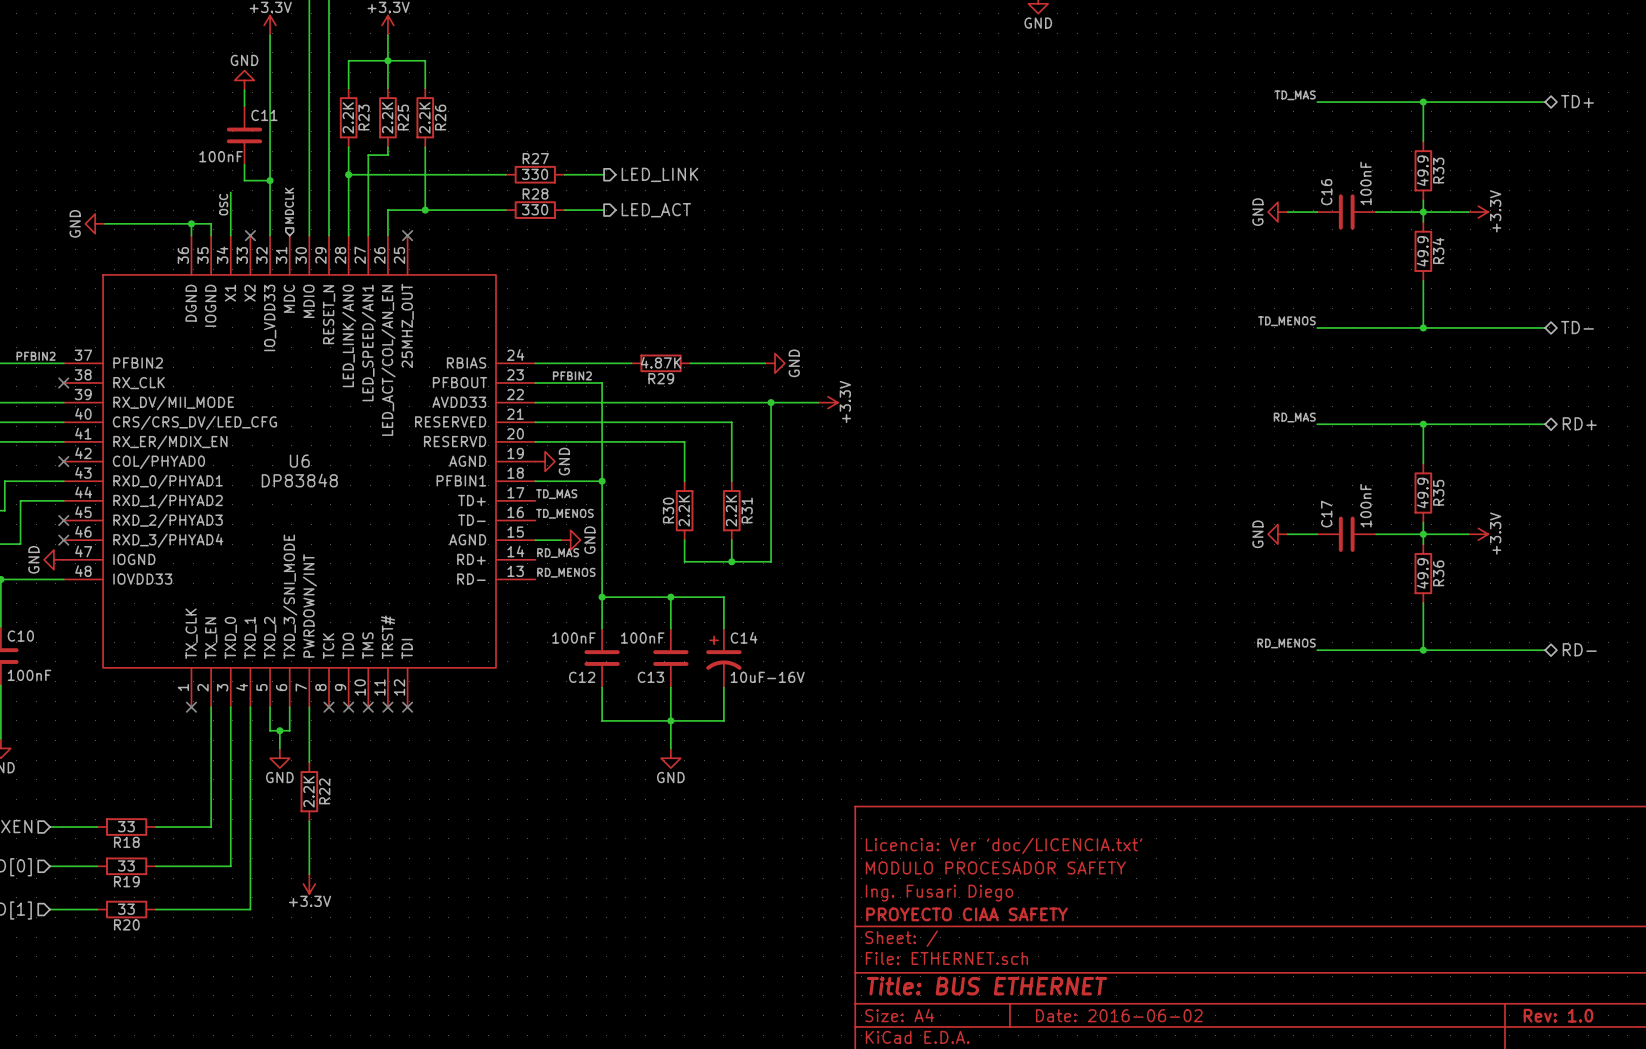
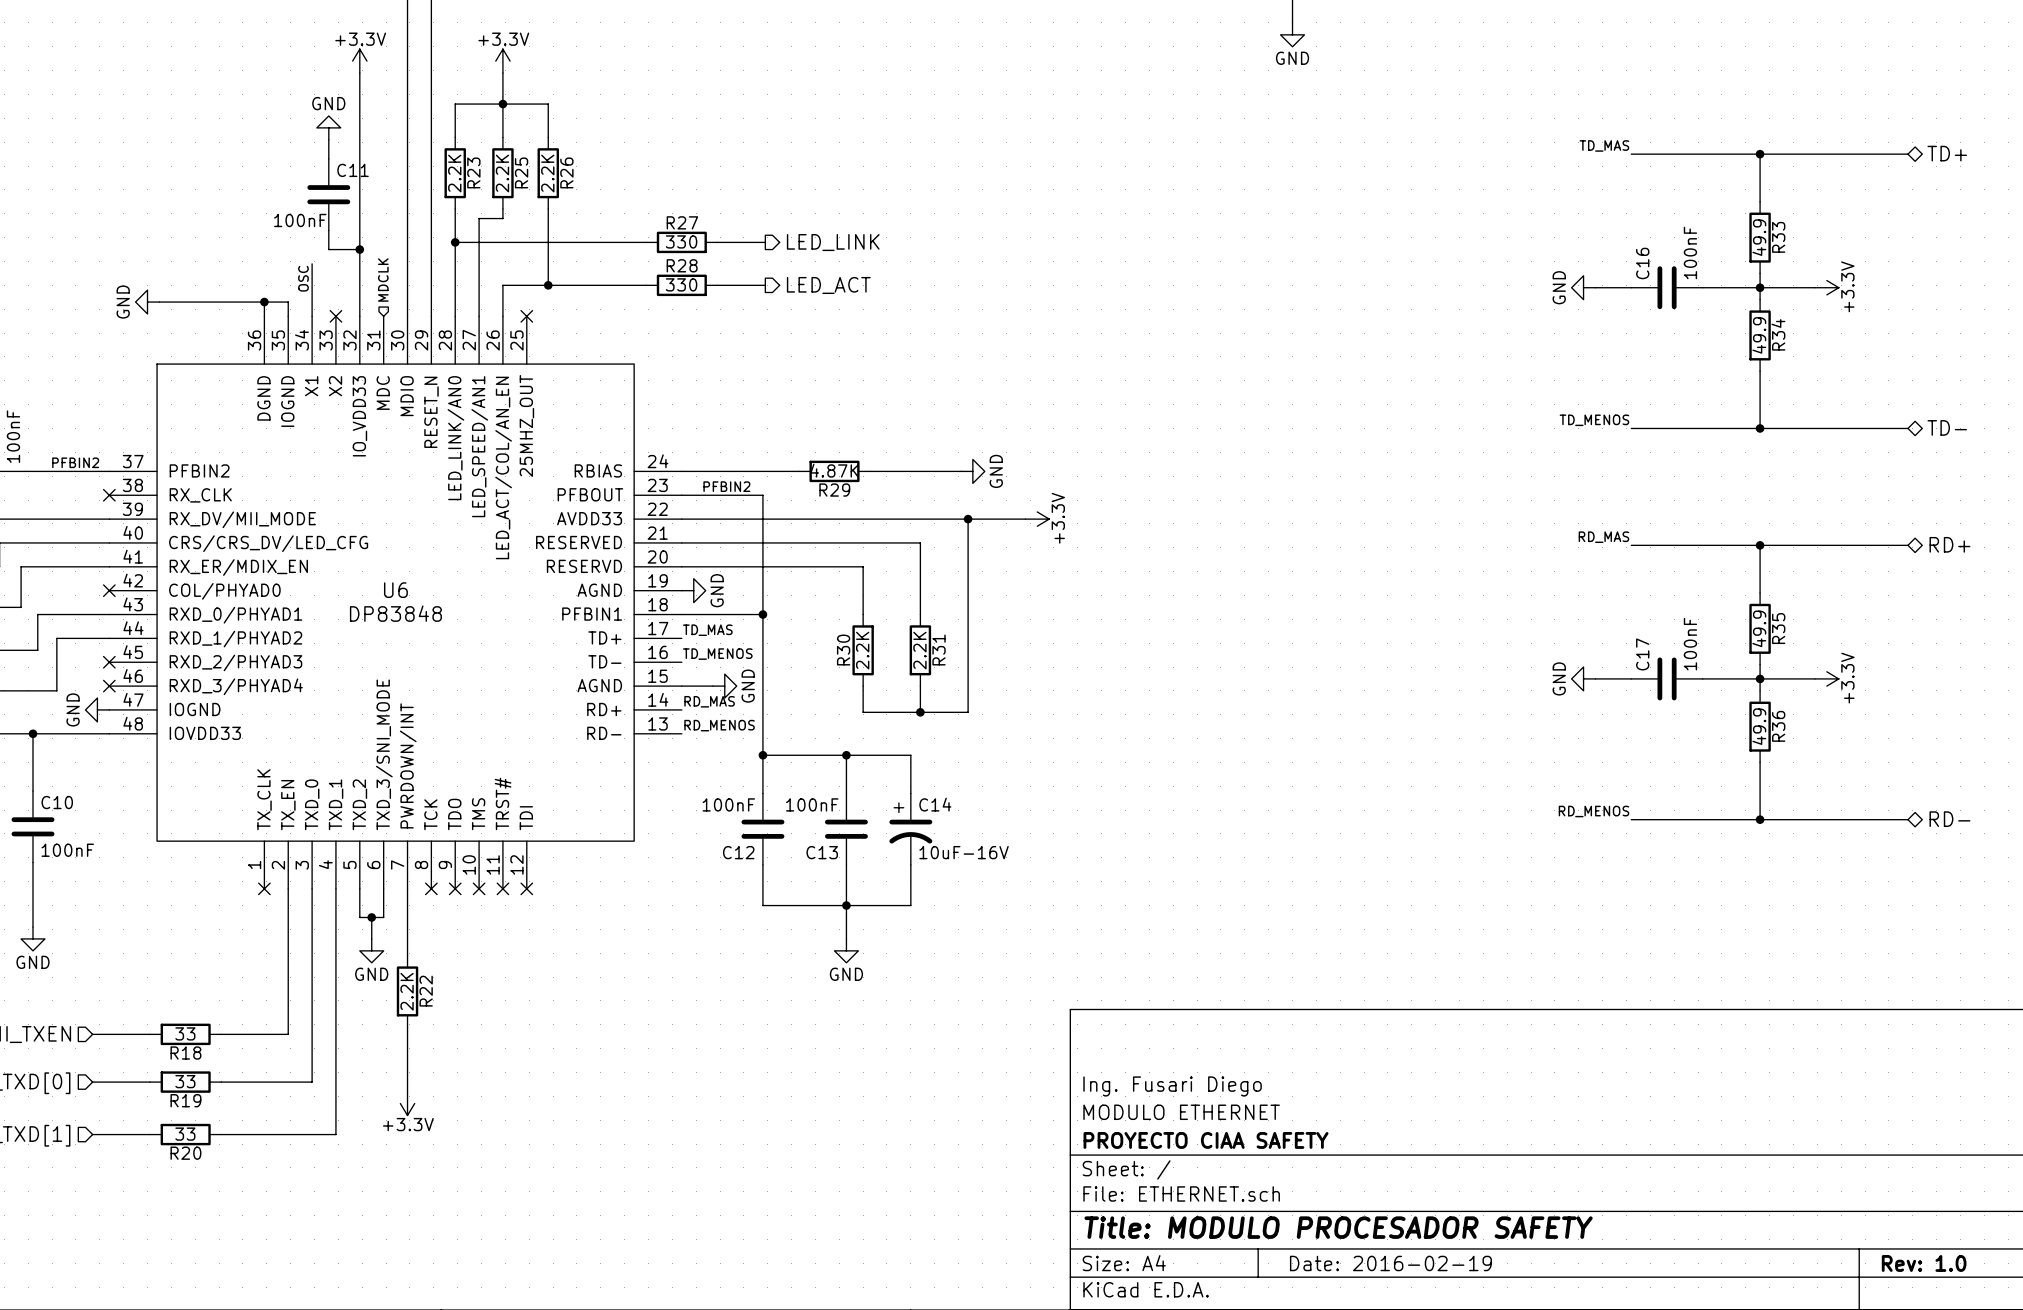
title block: Licencia: Ver 'doc/LICENCIA.txt' (1004, 845) -> none
title block: MODULO PROCESADOR SAFETY (995, 867) -> Ing. Fusari Diego (1172, 1086)
title block: Ing. Fusari Diego (939, 893) -> MODULO ETHERNET (1181, 1112)
title block: Title: BUS ETHERNET (987, 986) -> Title: MODULO PROCESADOR SAFETY (1338, 1227)
title block: Date: 2016-06-02 (1119, 1015) -> Date: 2016-02-19 (1390, 1263)

